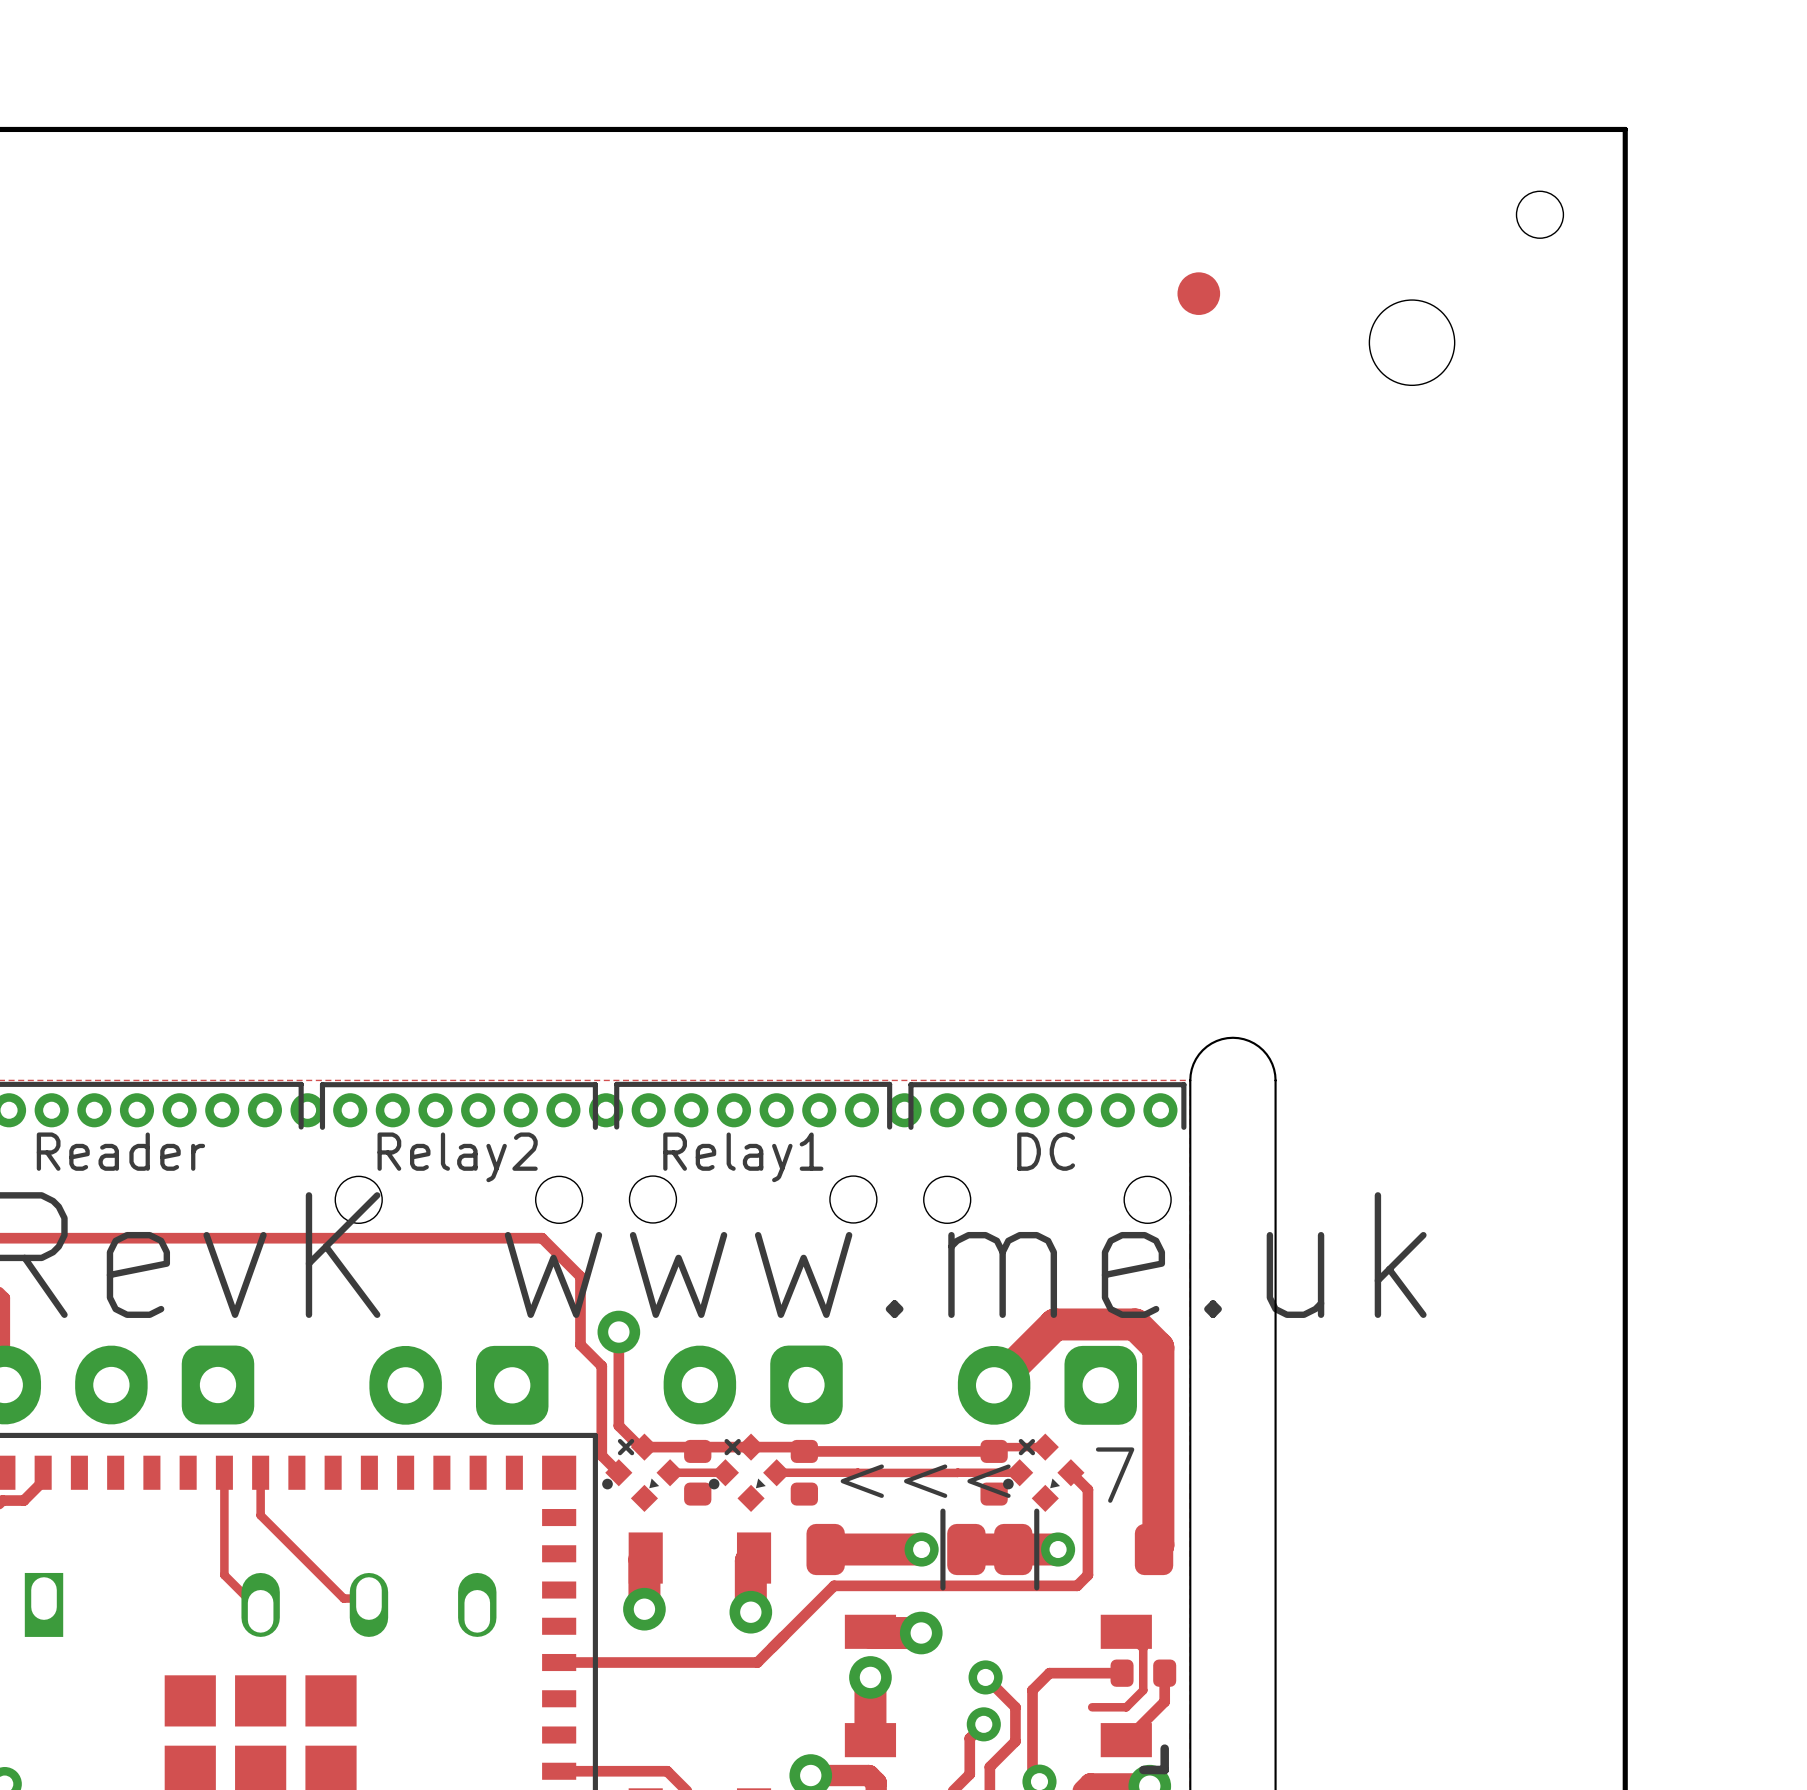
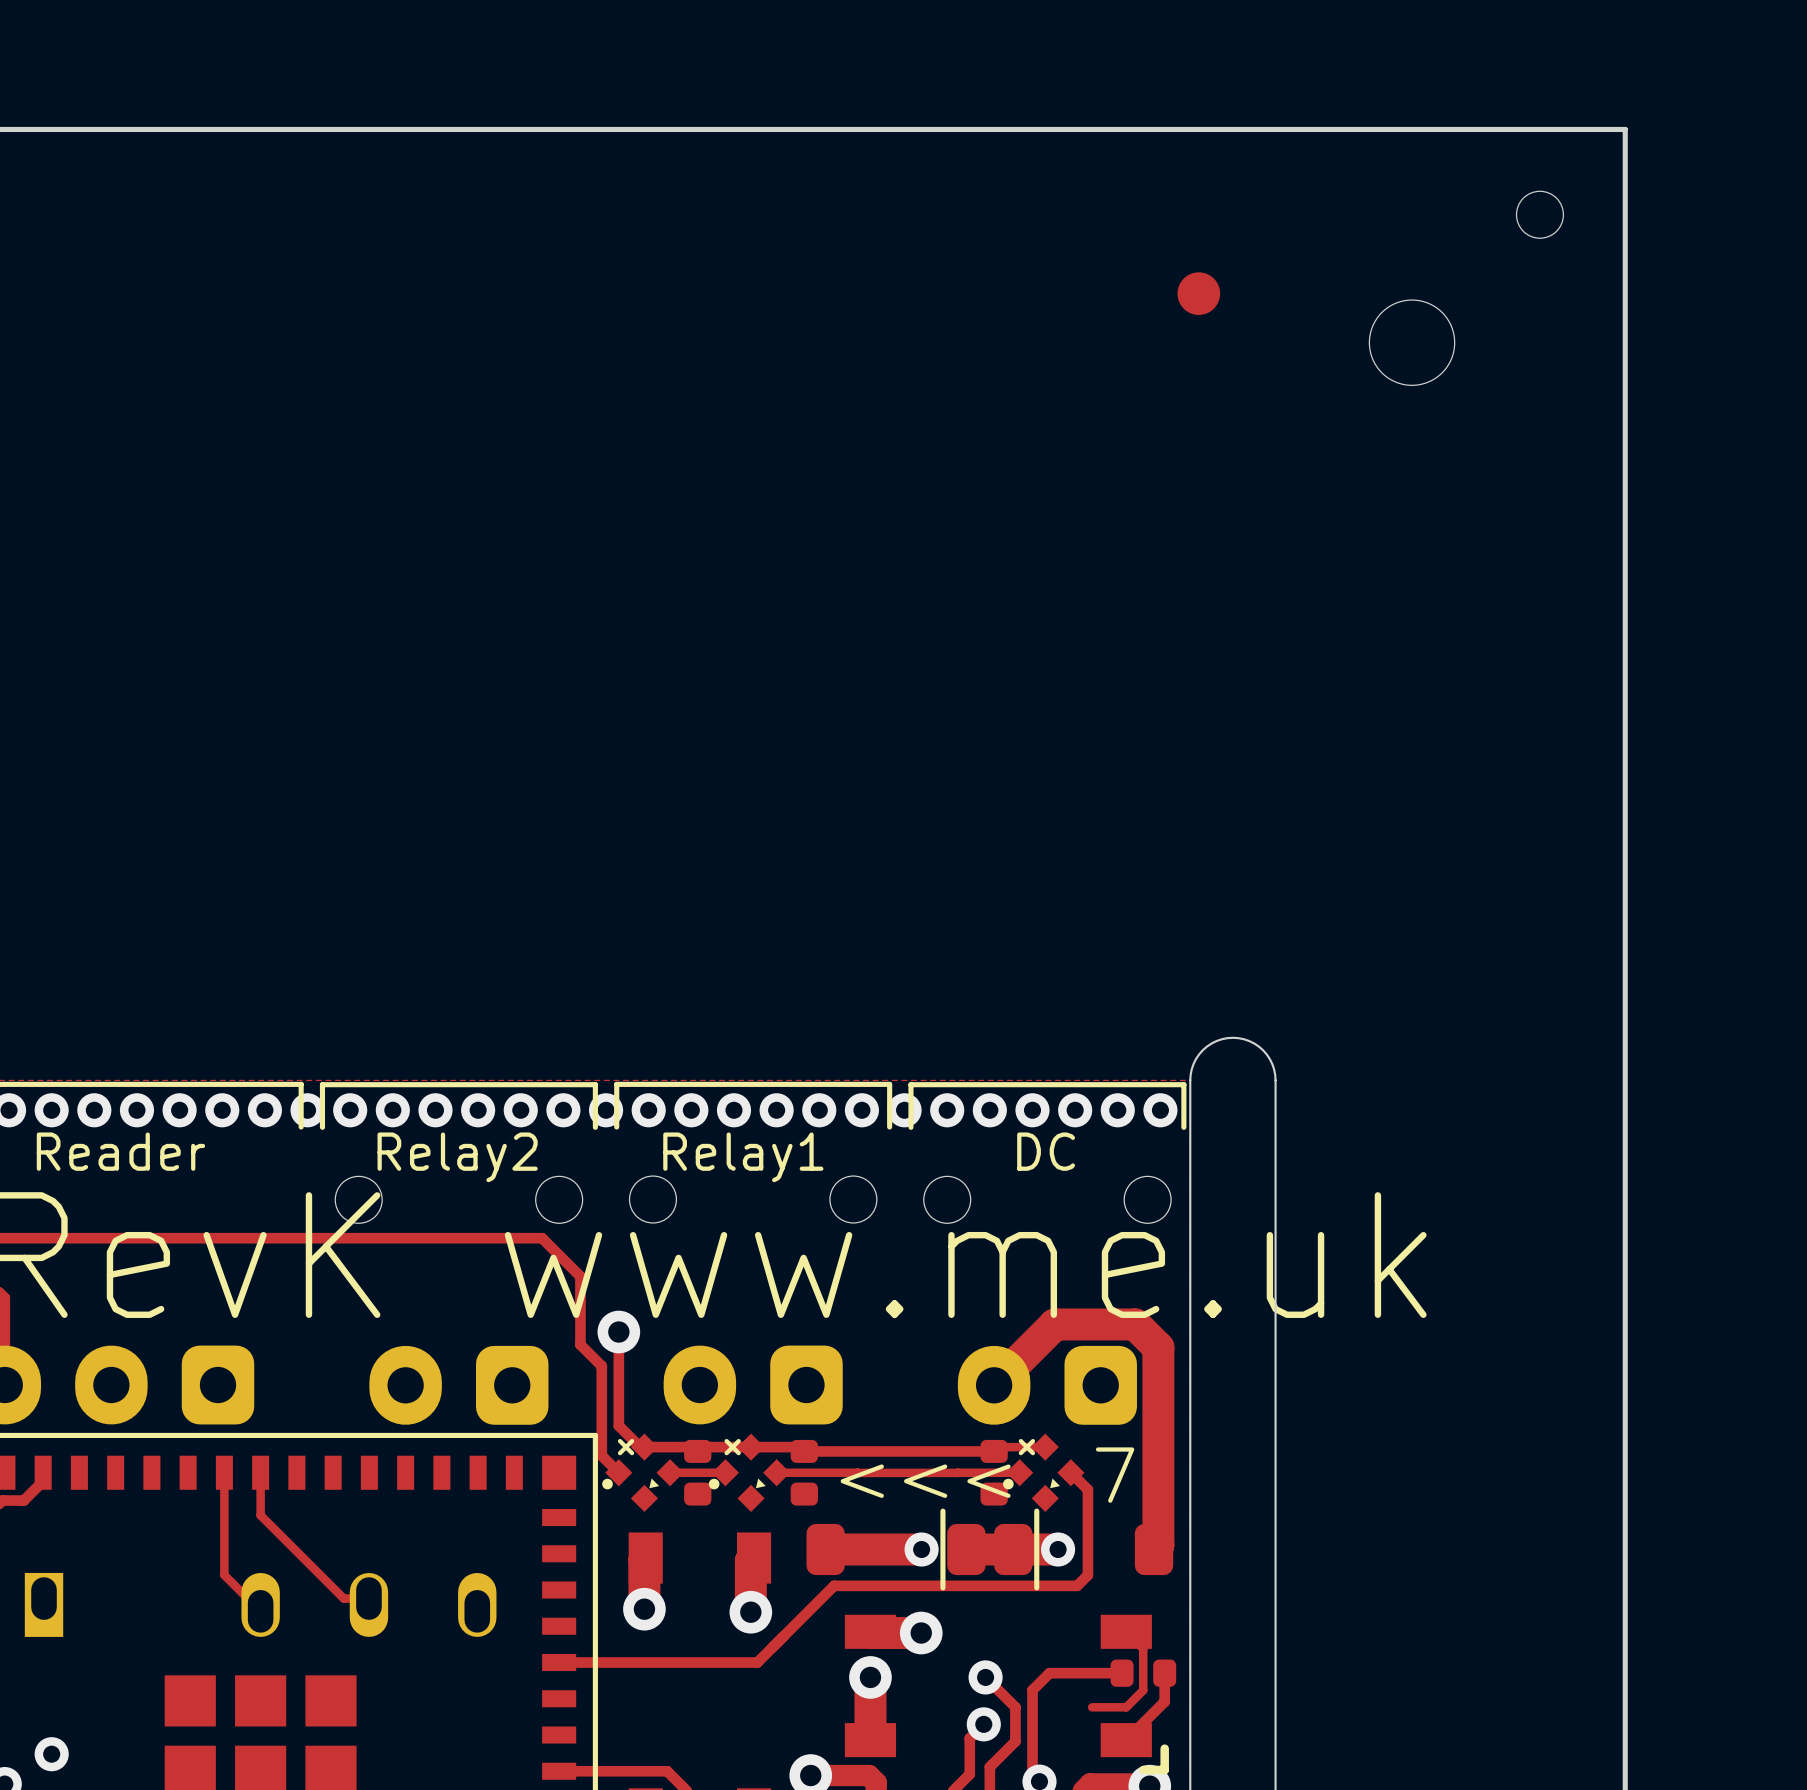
via: none -> (51, 1754)

